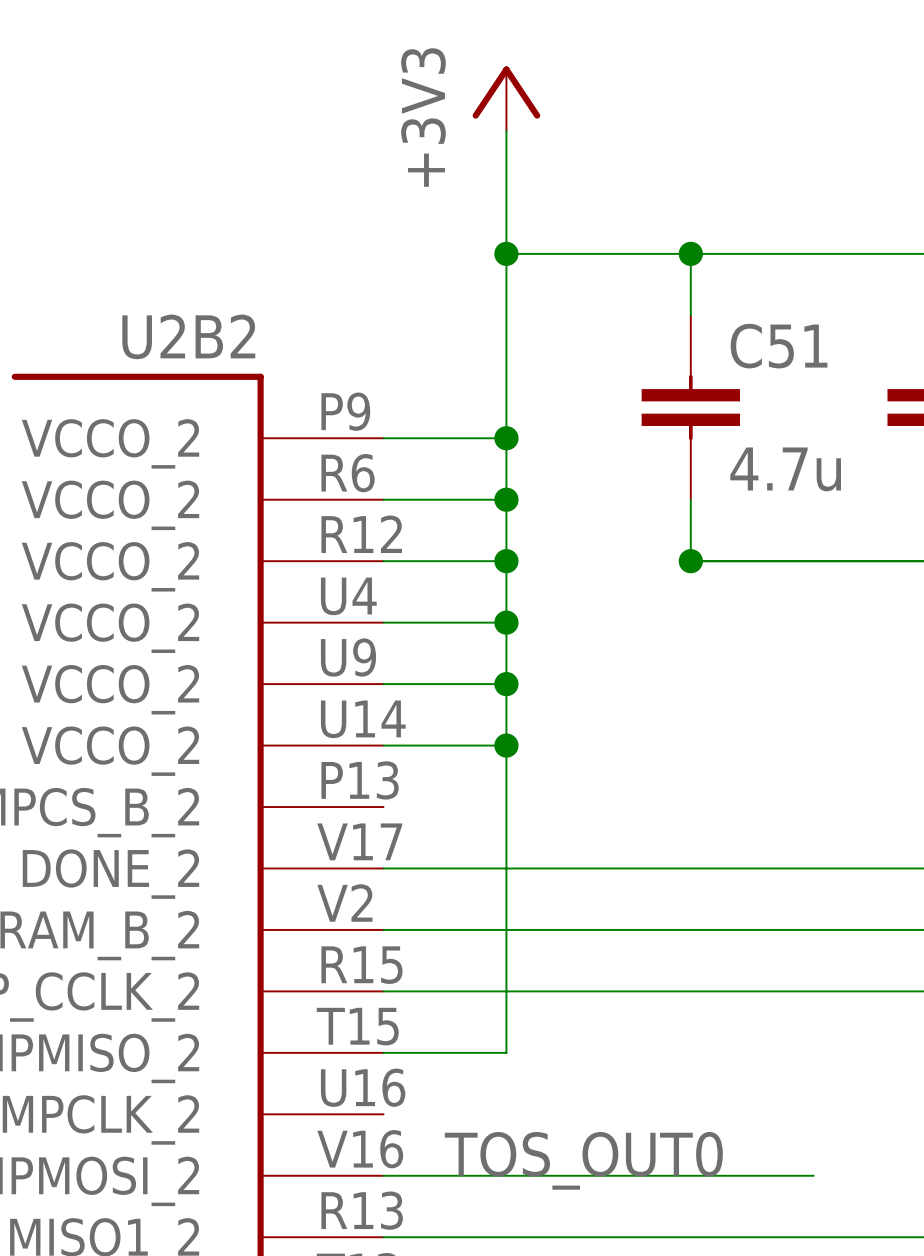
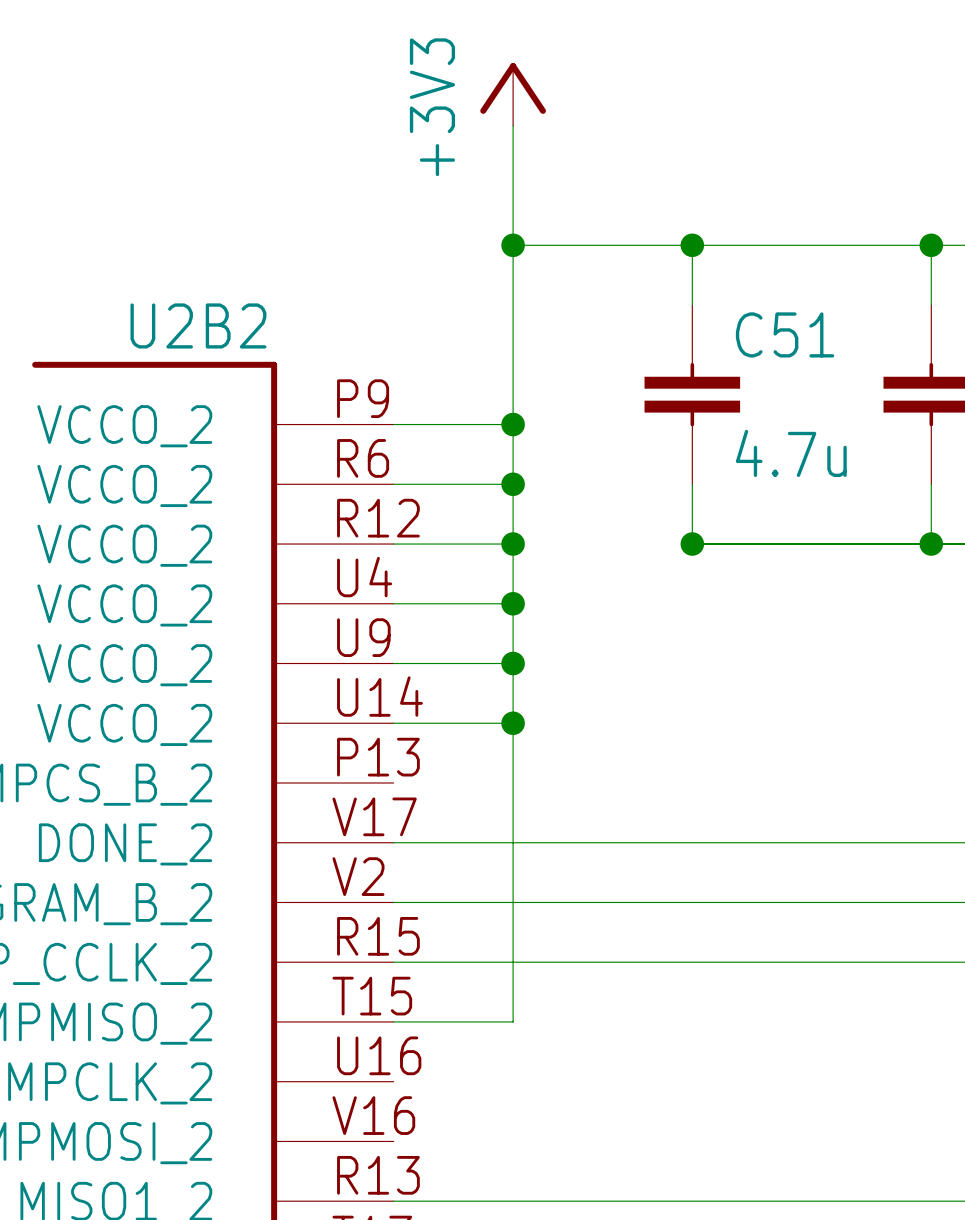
label: TOS_OUT0 (583, 1160) -> none
wire: (383, 1175) (813, 1175) -> none

